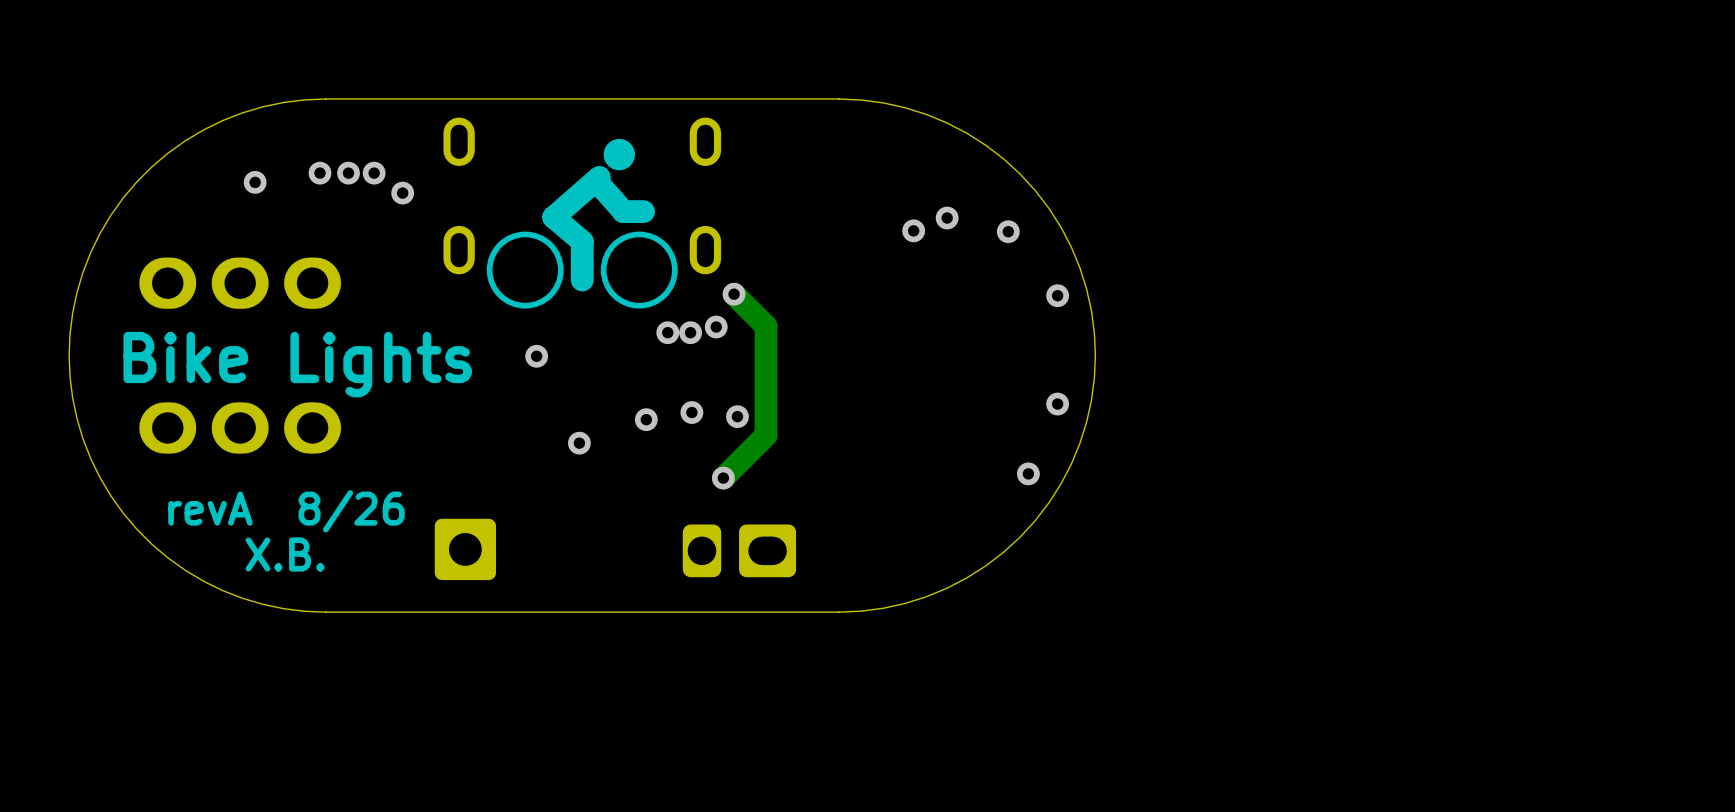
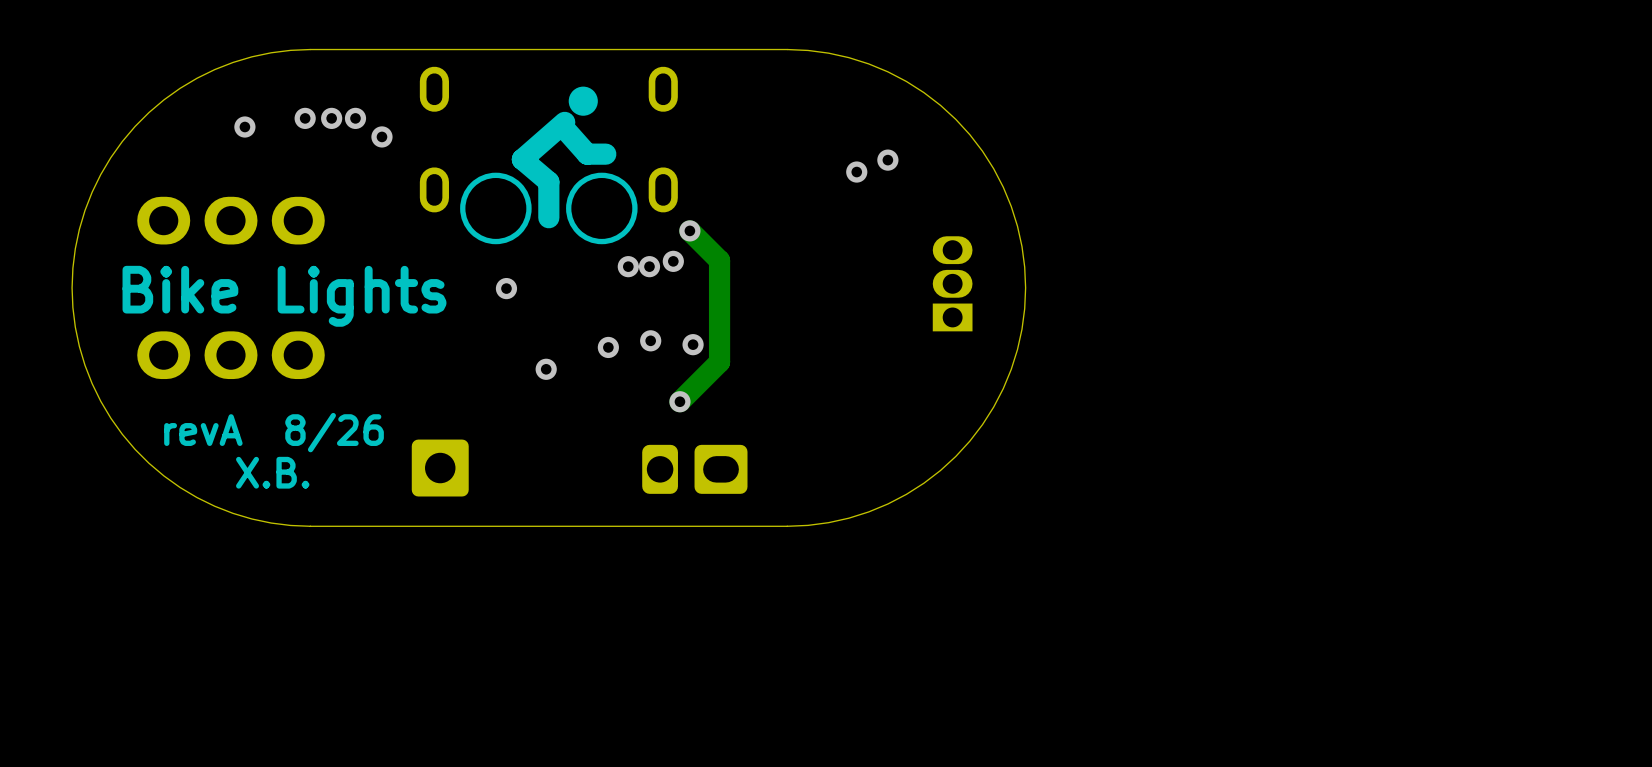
via: (1008, 231) -> none
via: (1057, 295) -> none
part: none -> (952, 283)
via: (1057, 404) -> none
via: (1028, 473) -> none

